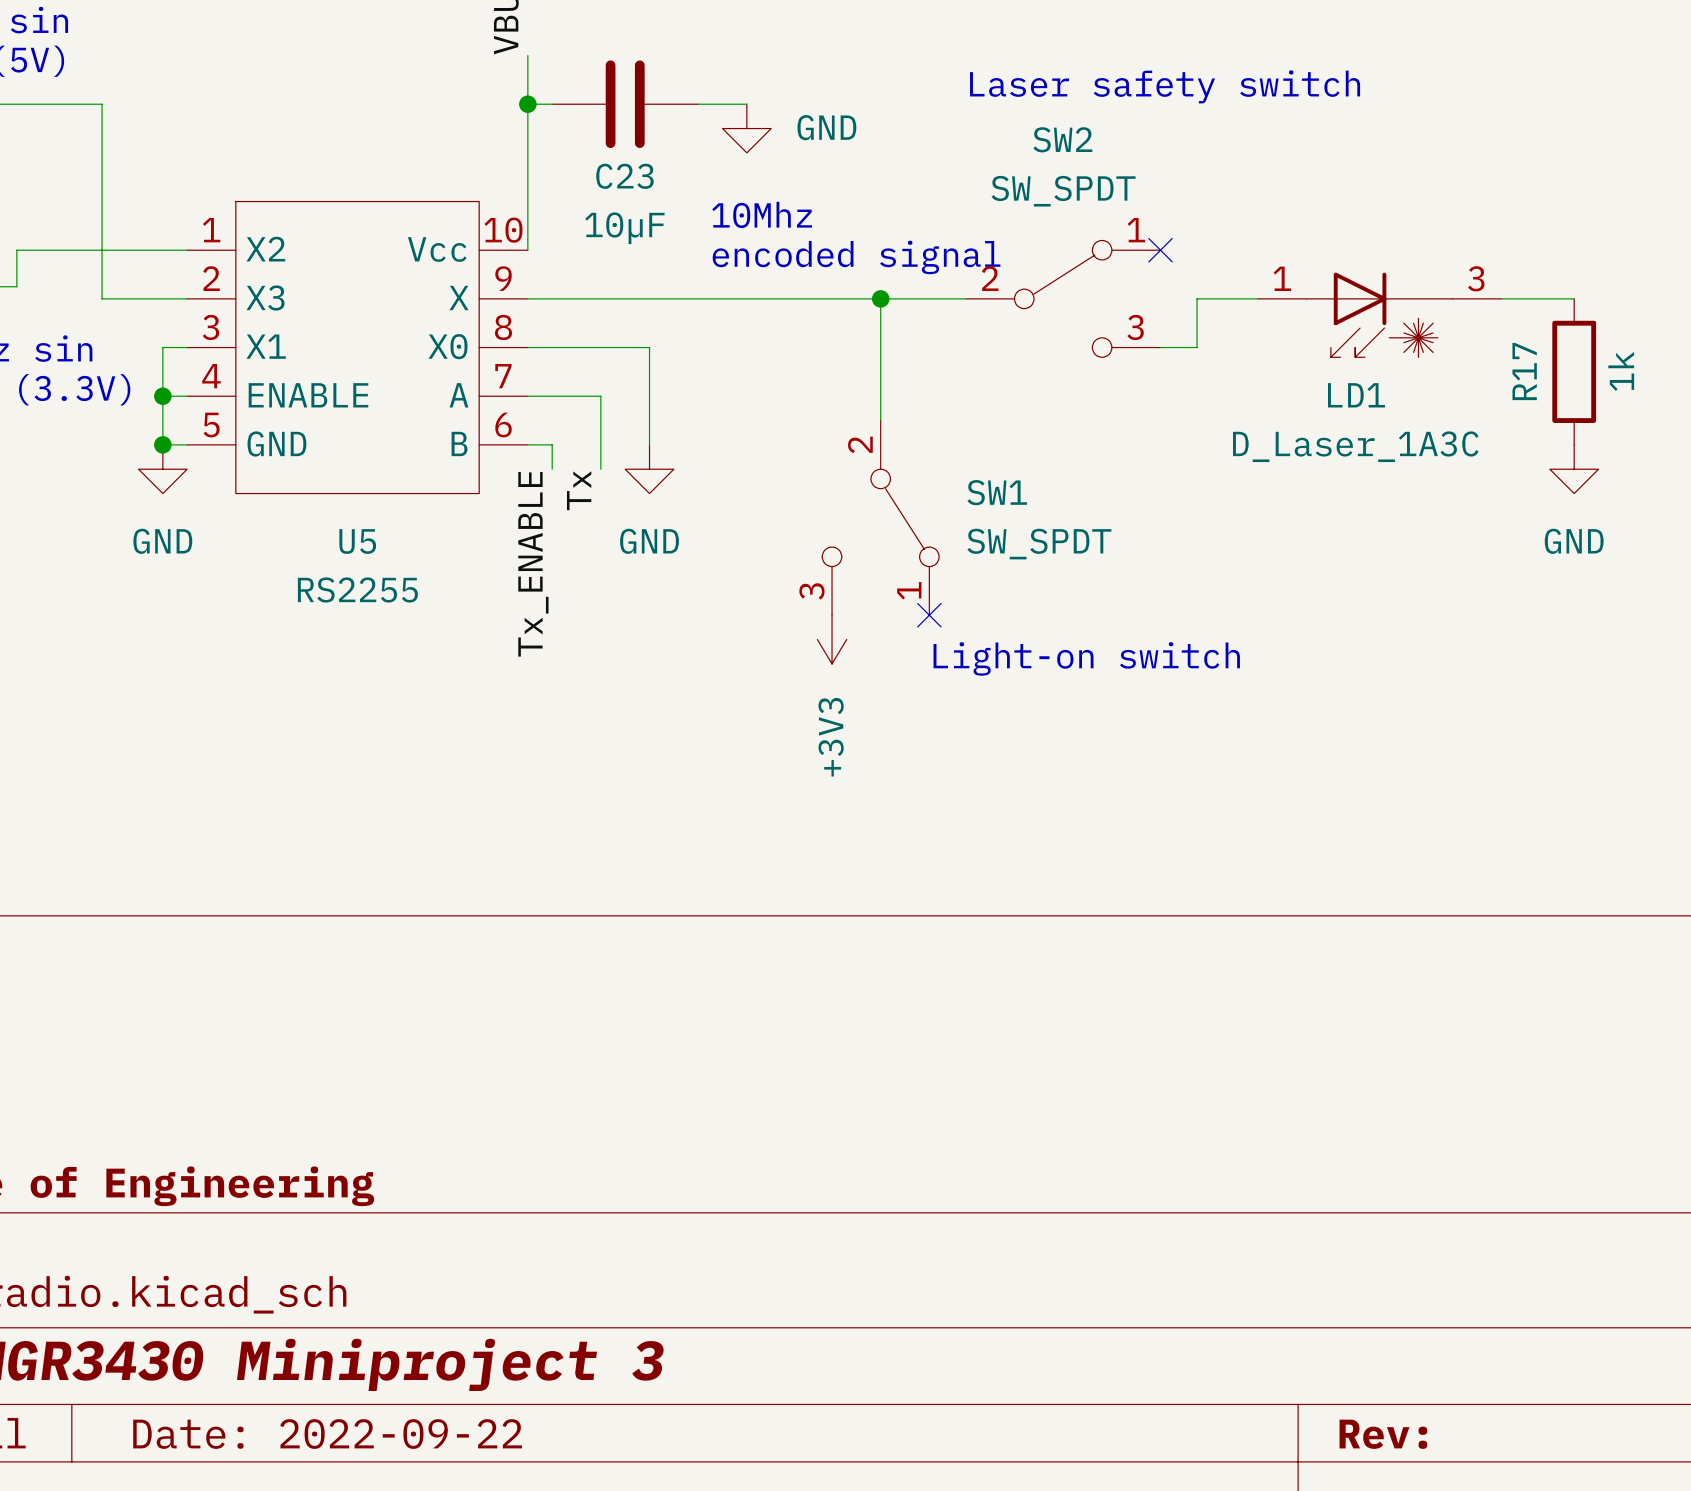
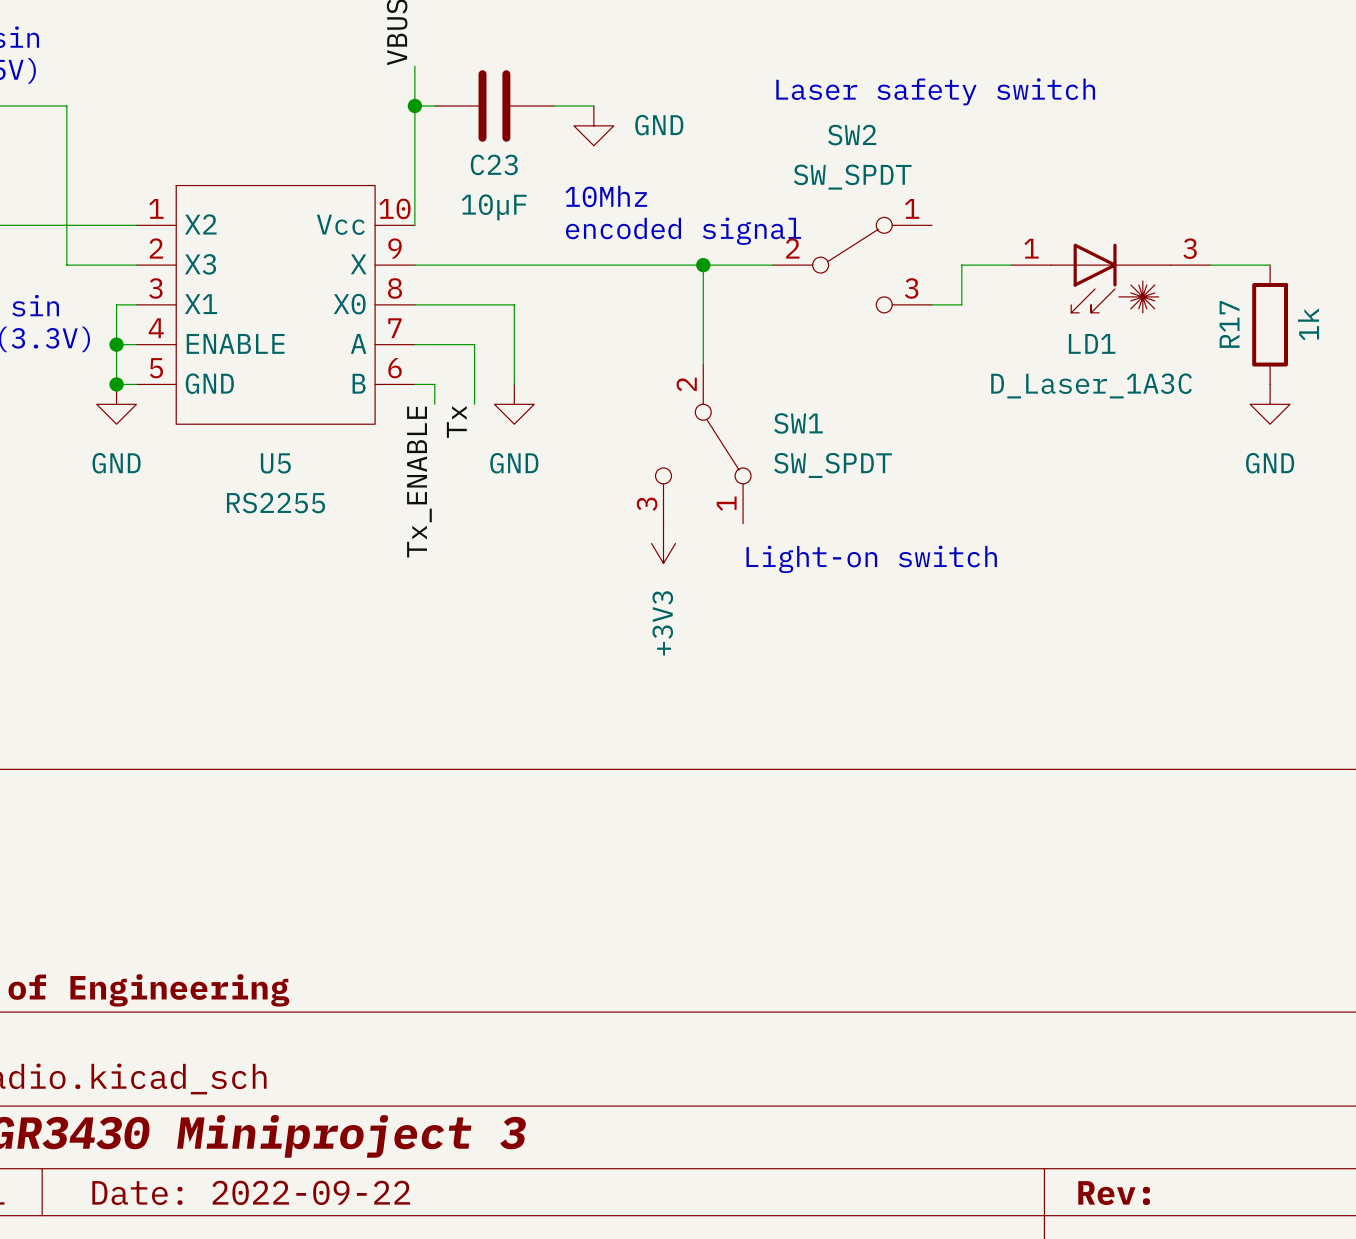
no-connect mark: (1160, 250) -> none
no-connect mark: (929, 615) -> none

